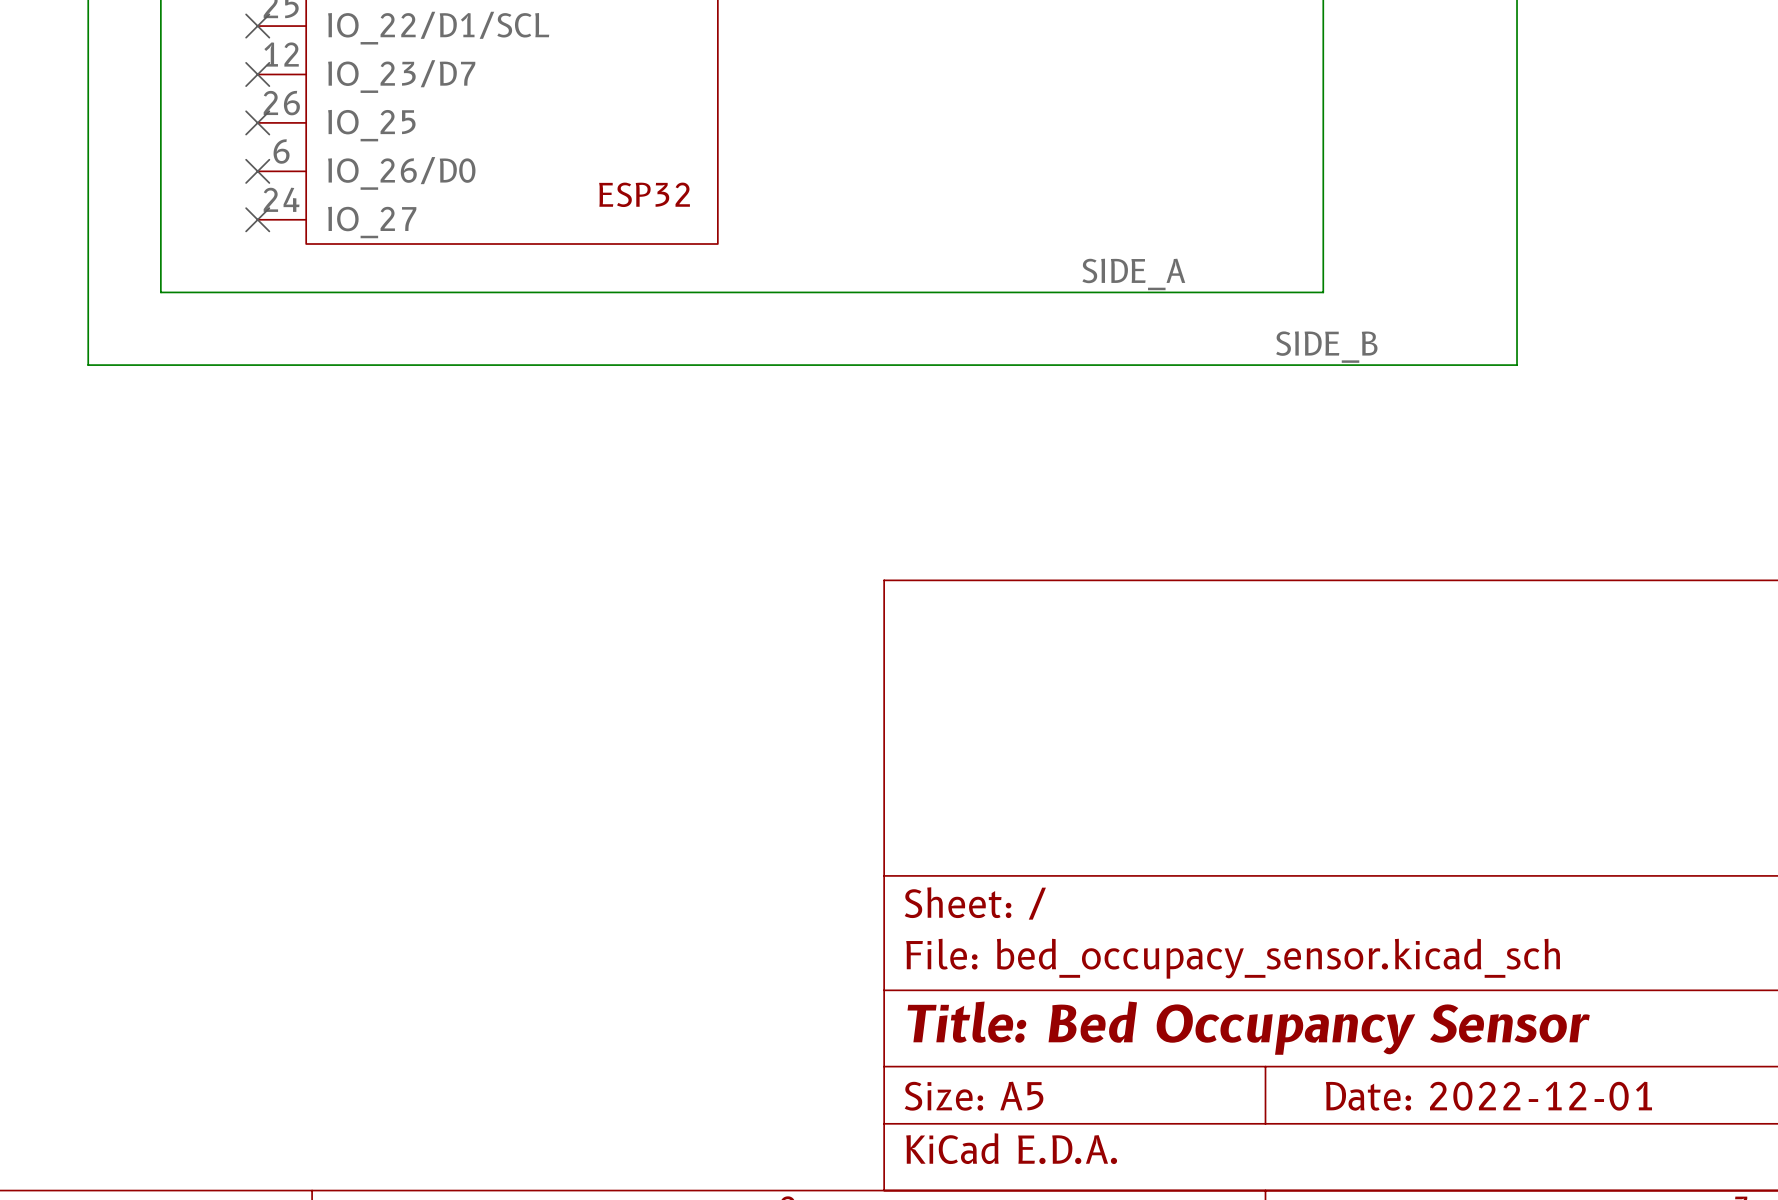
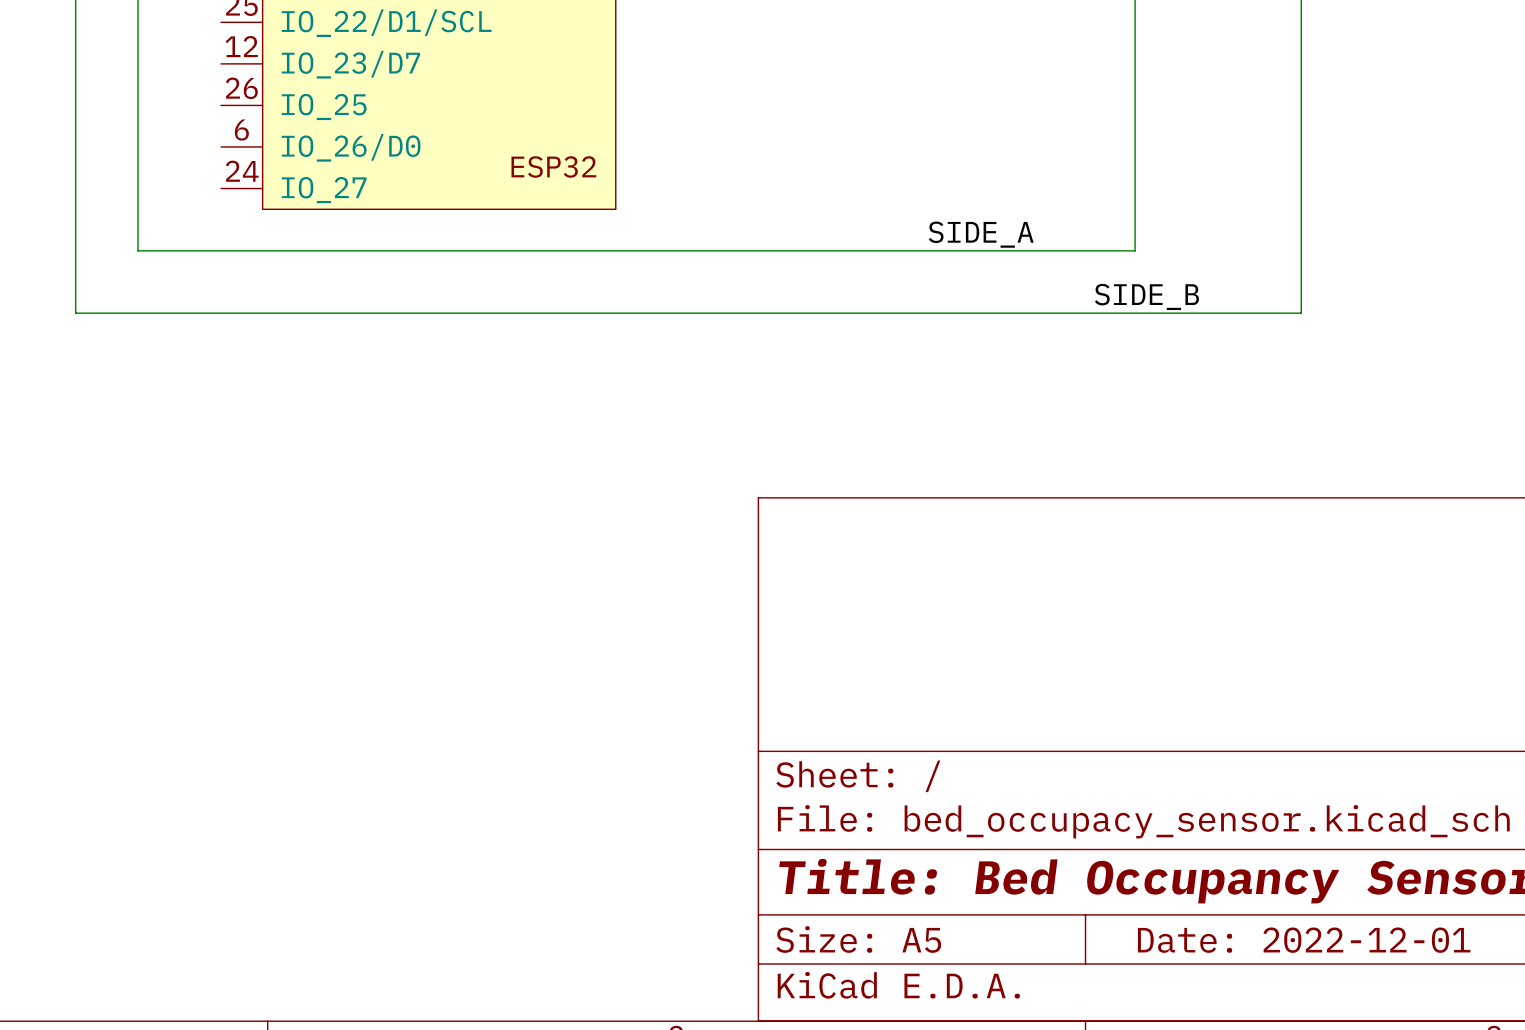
no-connect mark: (257, 26) -> none
no-connect mark: (257, 74) -> none
no-connect mark: (257, 122) -> none
no-connect mark: (257, 171) -> none
no-connect mark: (257, 219) -> none

